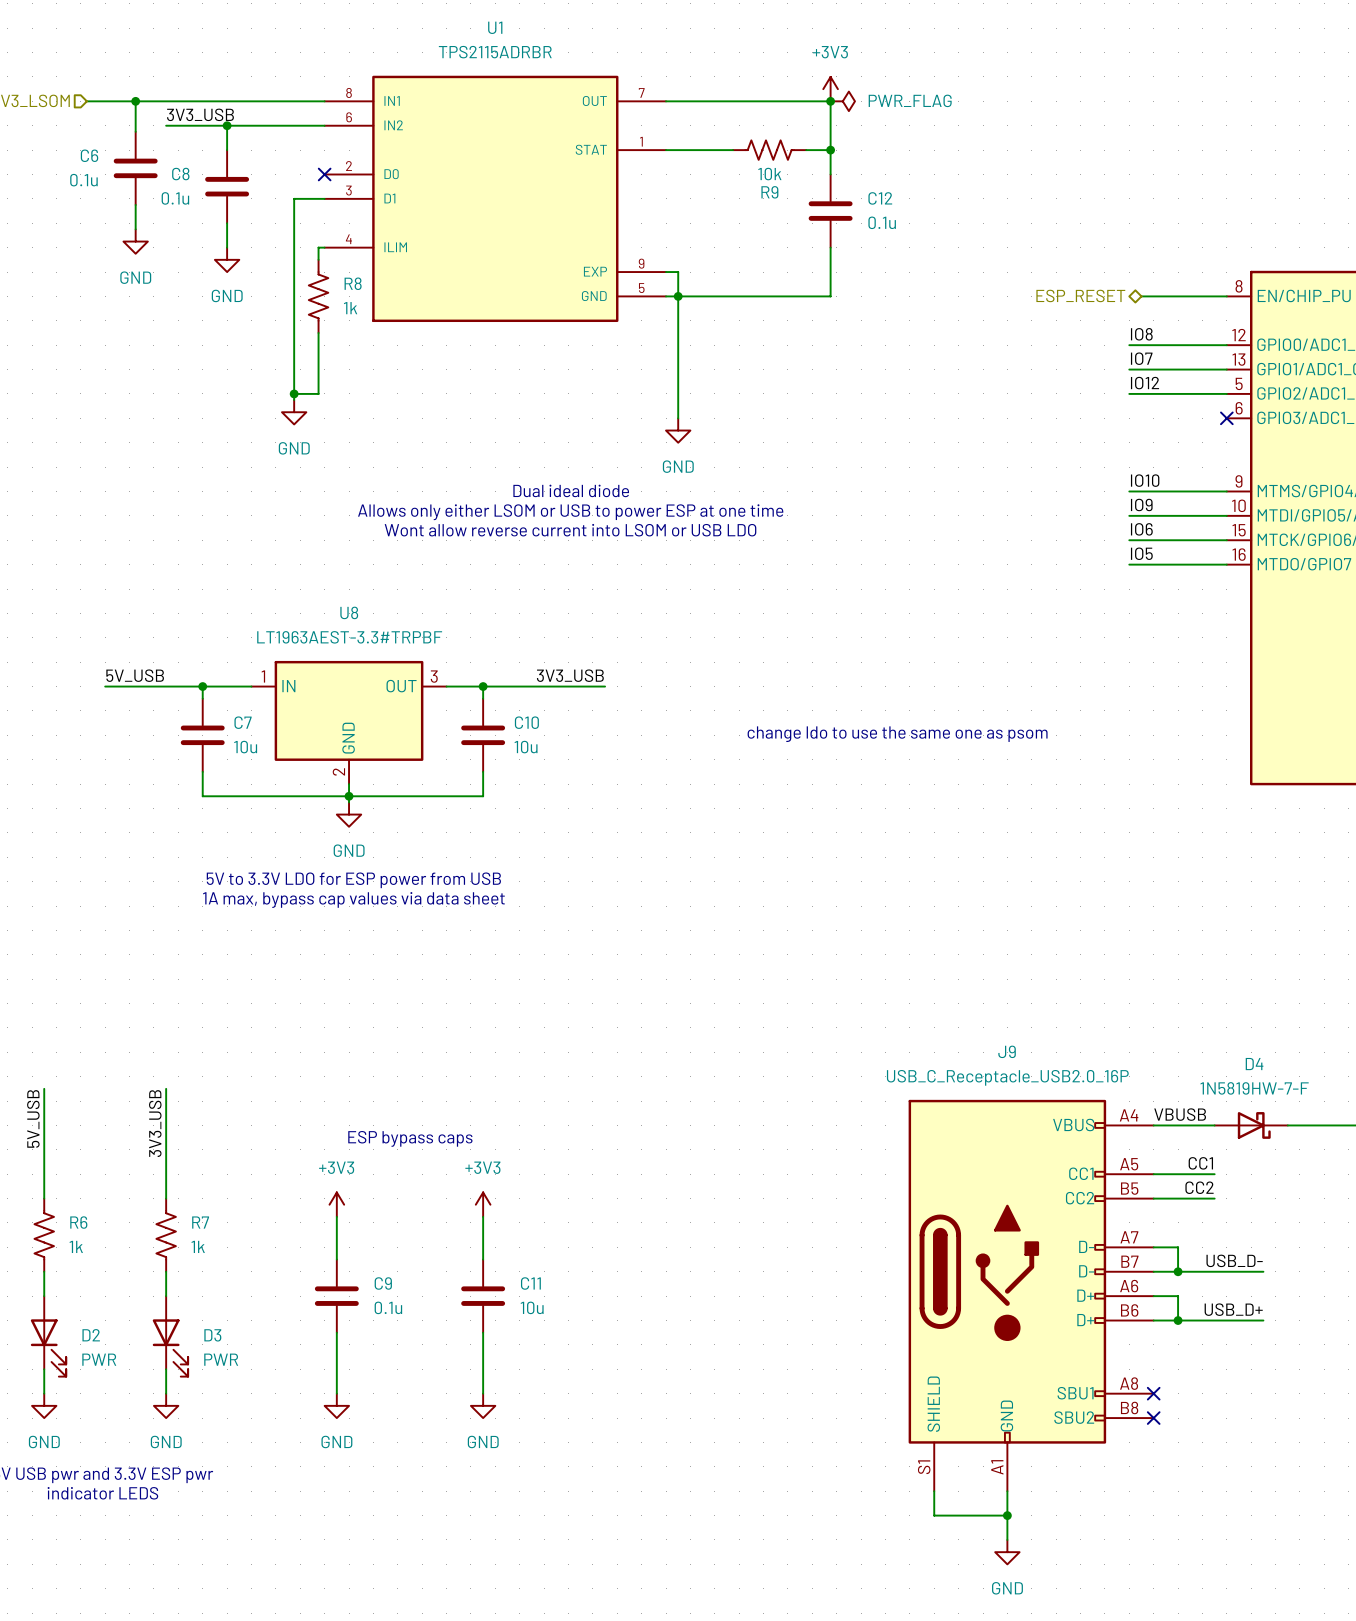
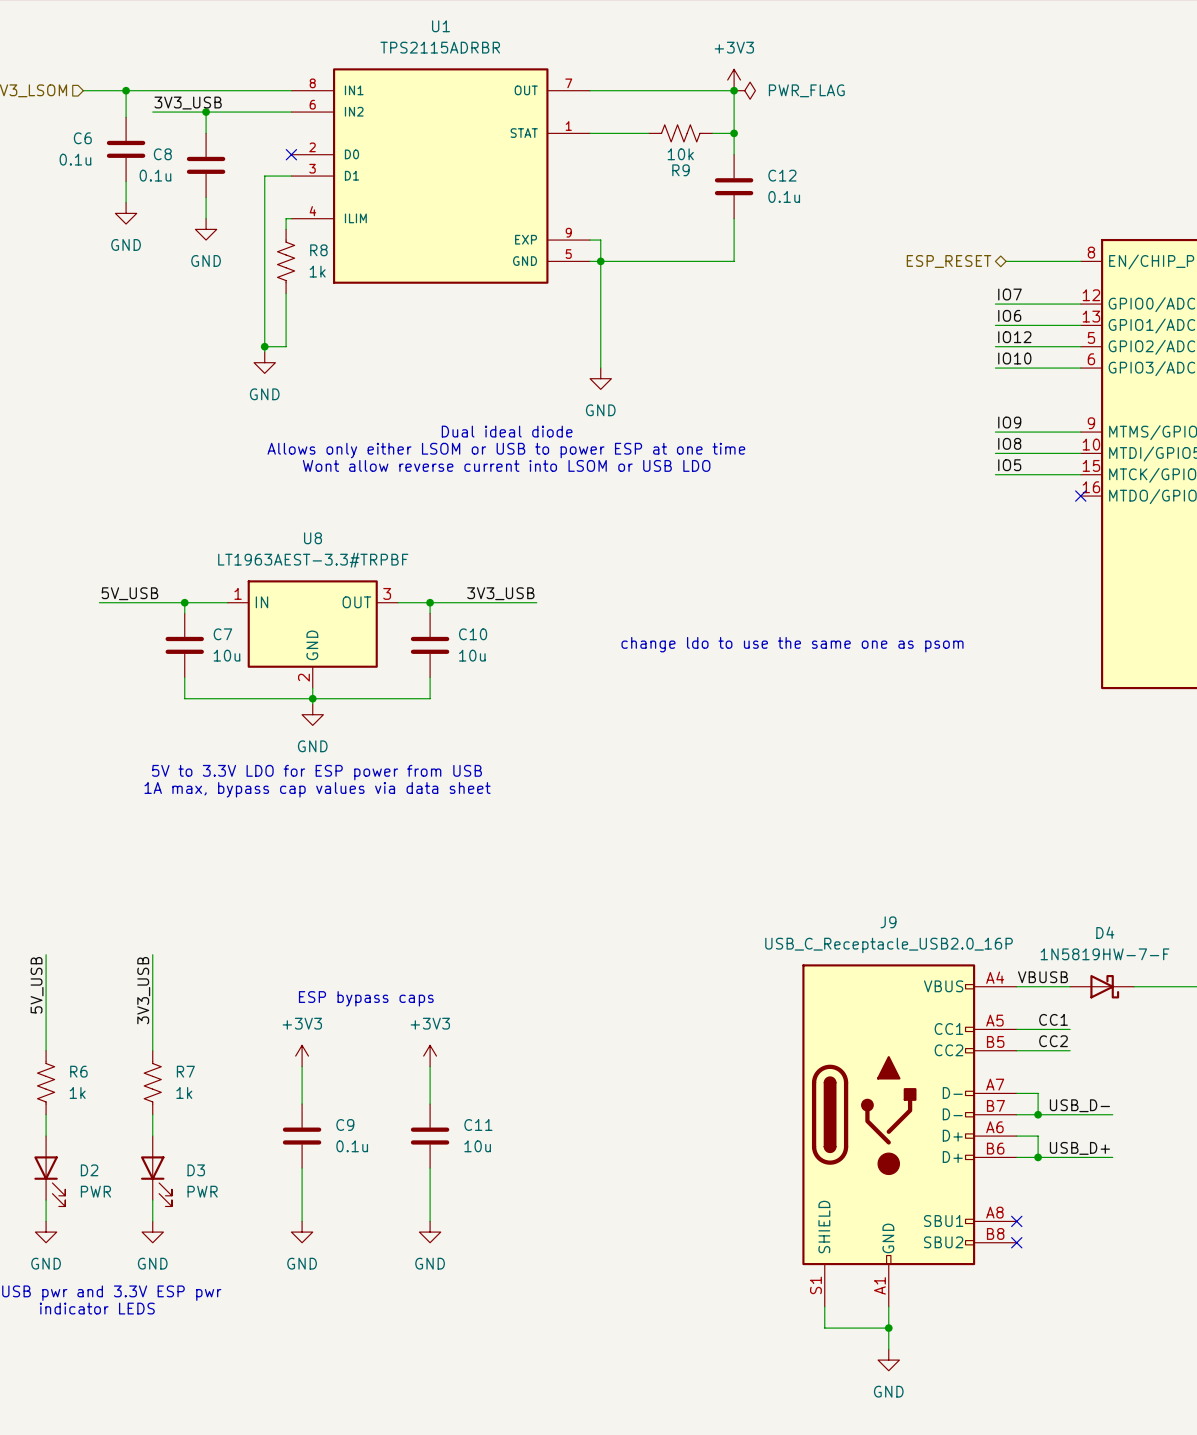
label: IO8 (1141, 334) -> IO7 (1009, 294)
label: IO7 (1141, 358) -> IO6 (1009, 315)
label: none -> IO10 (1014, 358)
no-connect mark: (1226, 418) -> none
label: IO10 (1145, 480) -> IO9 (1009, 422)
label: IO9 (1141, 504) -> IO8 (1009, 443)
label: IO6 (1141, 529) -> IO5 (1009, 465)
label: IO5 (1141, 553) -> none
wire: (1129, 564) (1226, 564) -> (995, 368) (1080, 368)
no-connect mark: none -> (1080, 496)

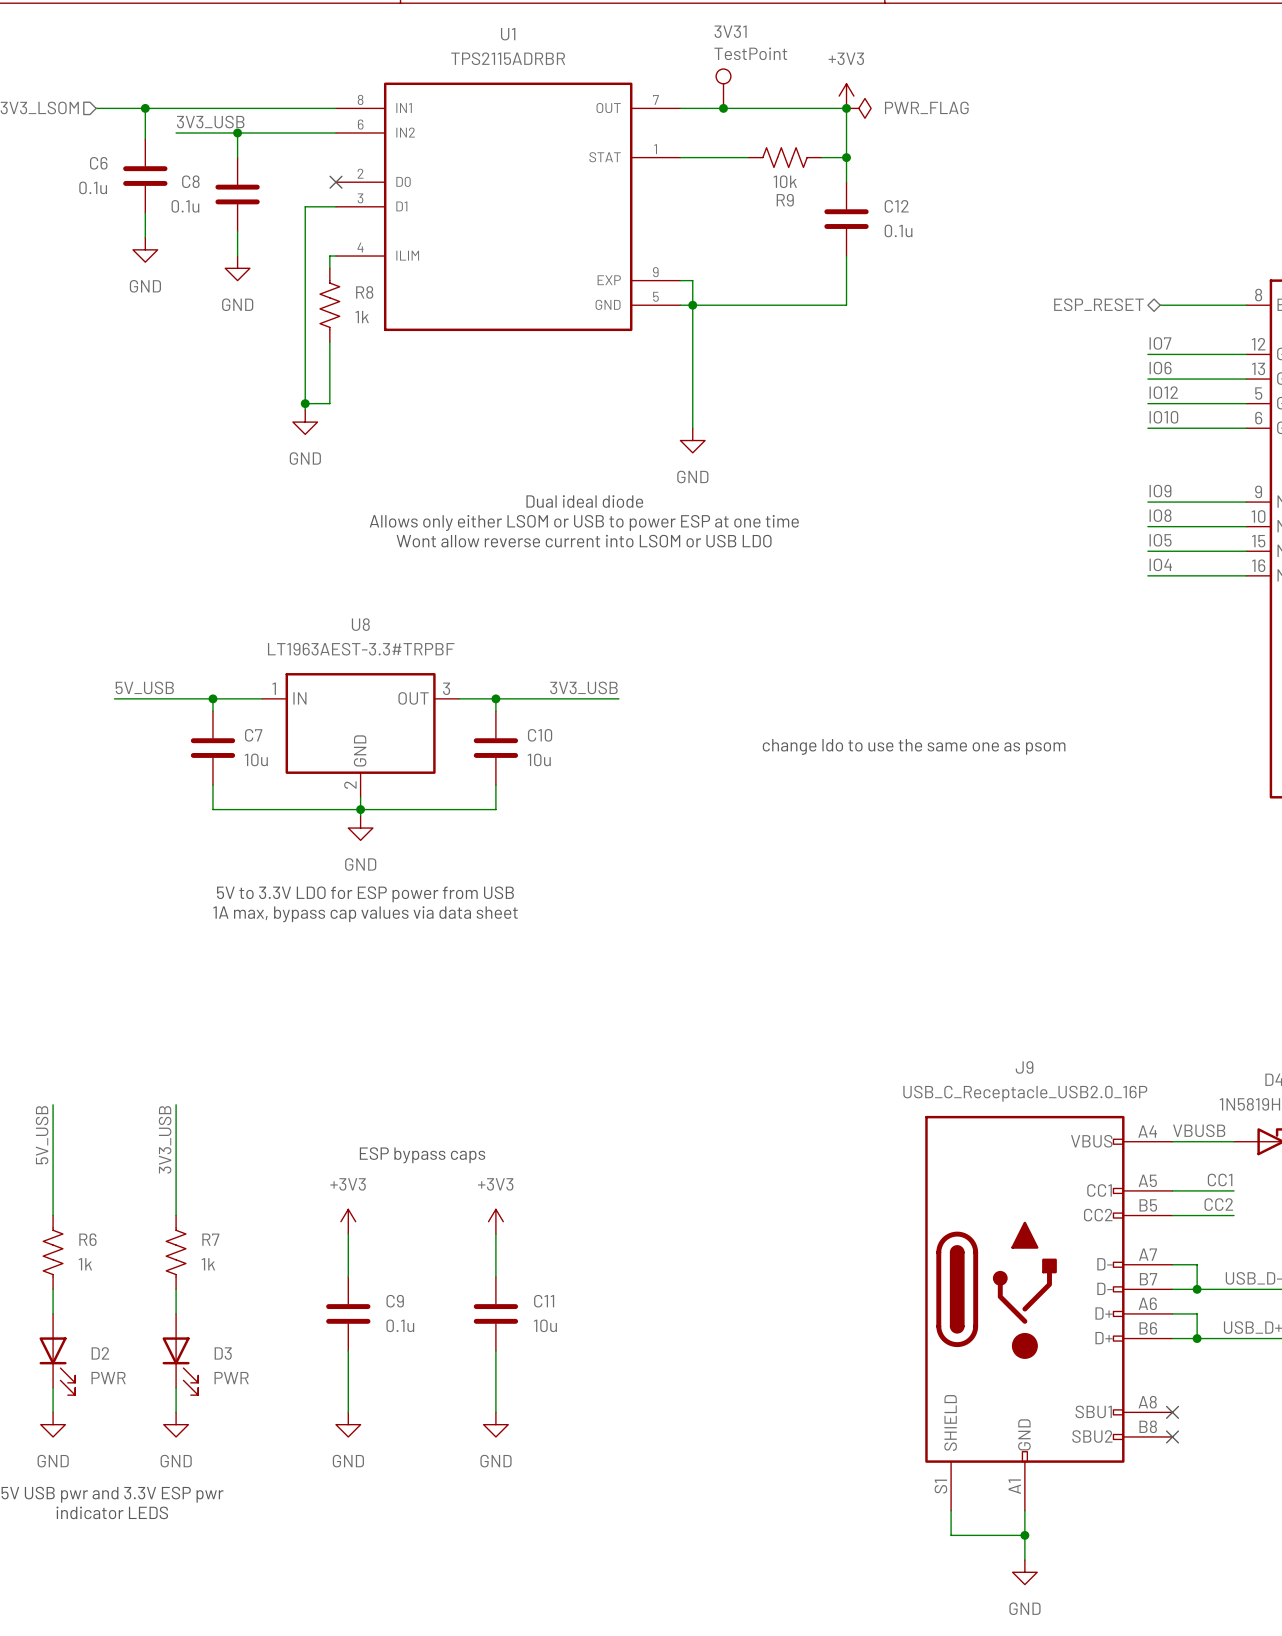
3V31: none -> TestPoint (723, 88)
junction: none -> (723, 108)
label: none -> IO4 (1160, 564)
wire: none -> (1147, 575) (1246, 575)
no-connect mark: (1080, 496) -> none

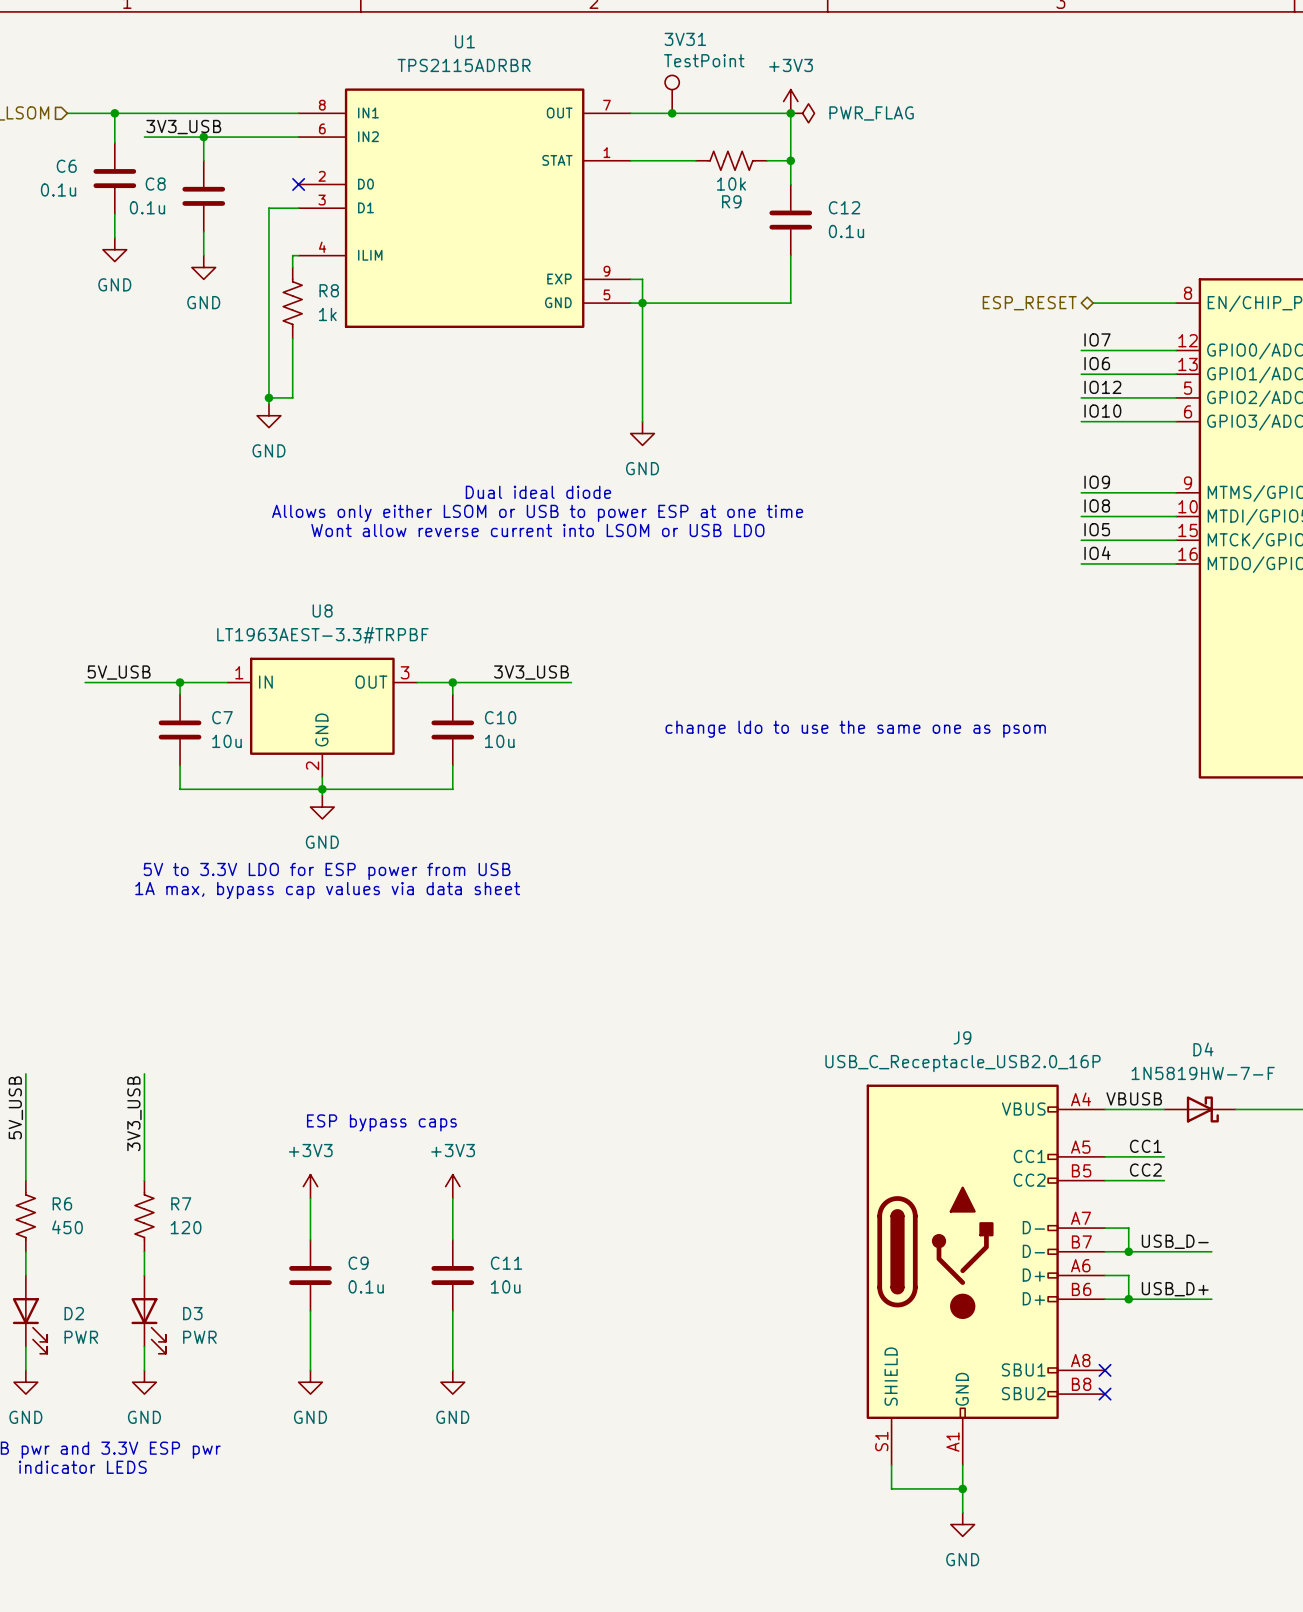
R6 value: 1k (85, 1264) -> 450 (67, 1227)
R7 value: 1k (208, 1264) -> 120 (186, 1227)

